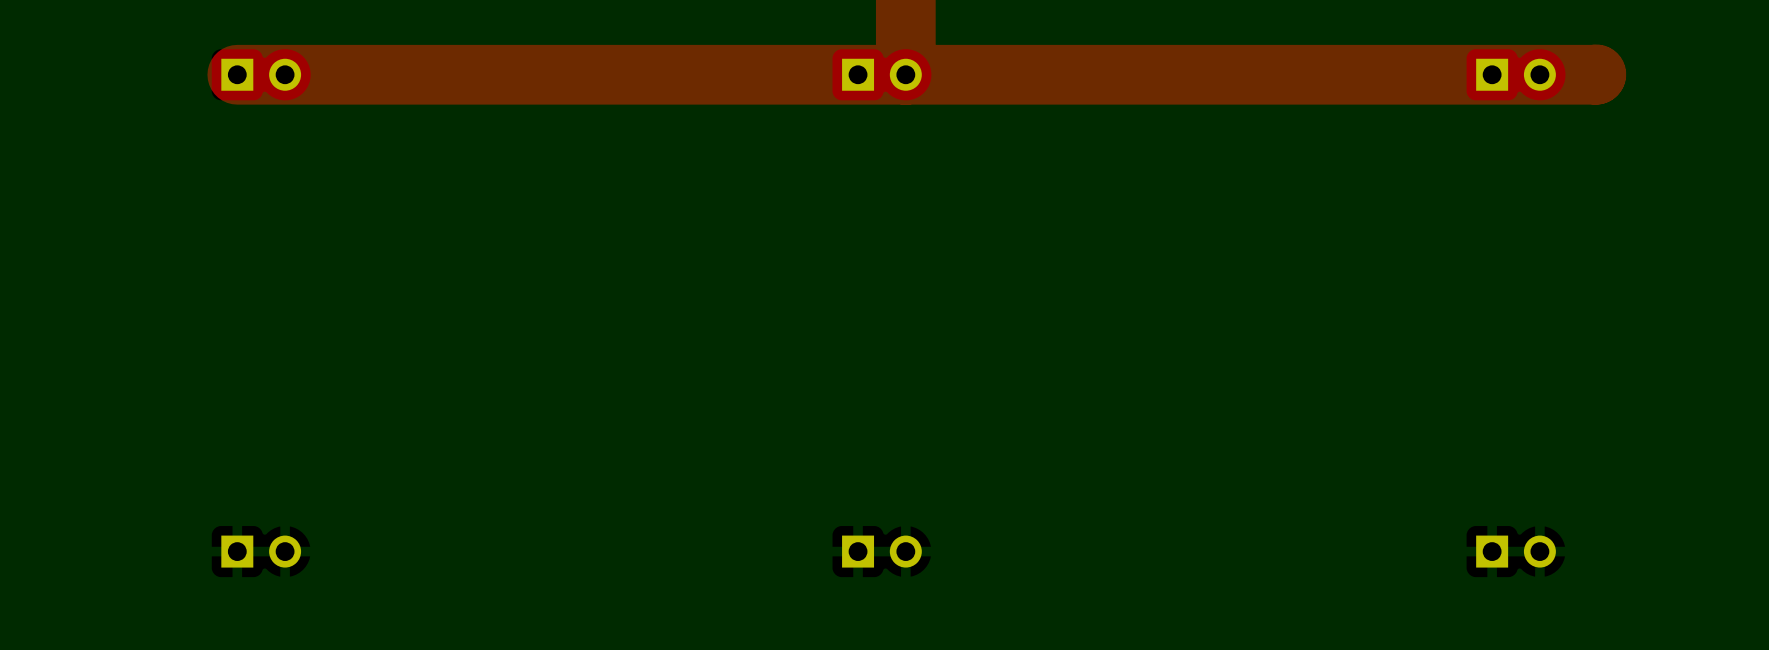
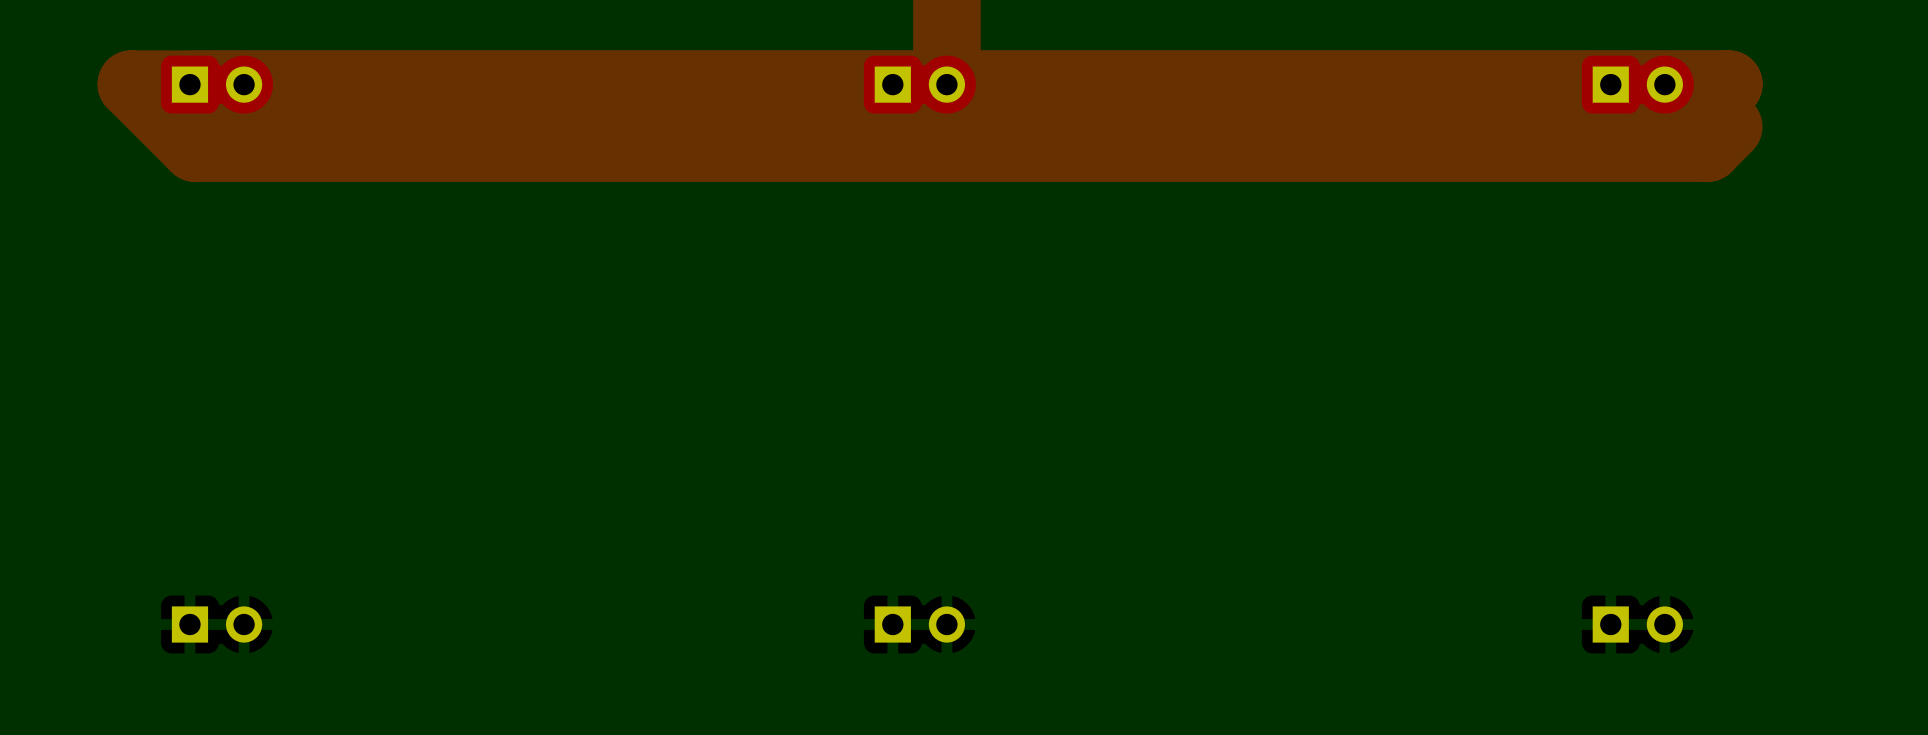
top track: none -> (1728, 84) (131, 84) (195, 148) (1707, 148) (1728, 126)

